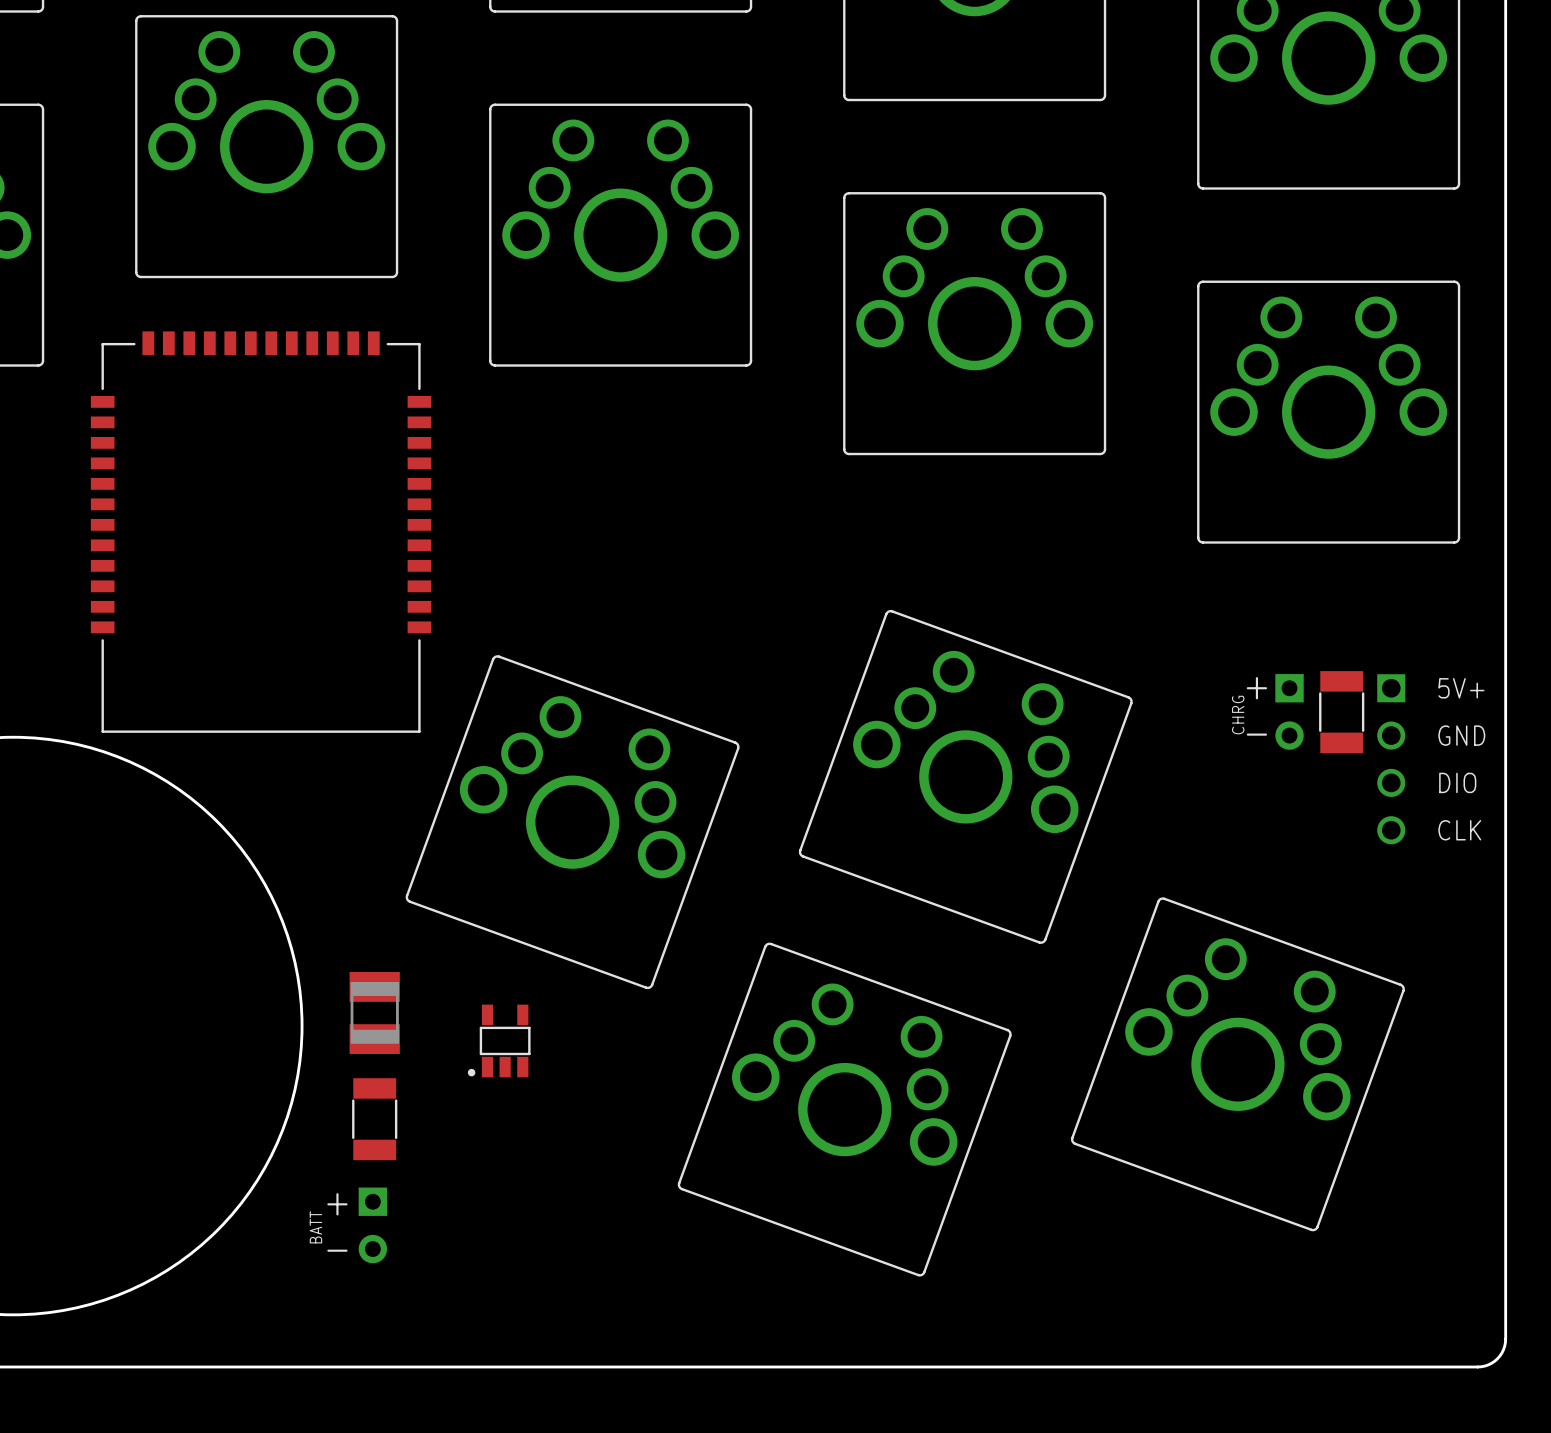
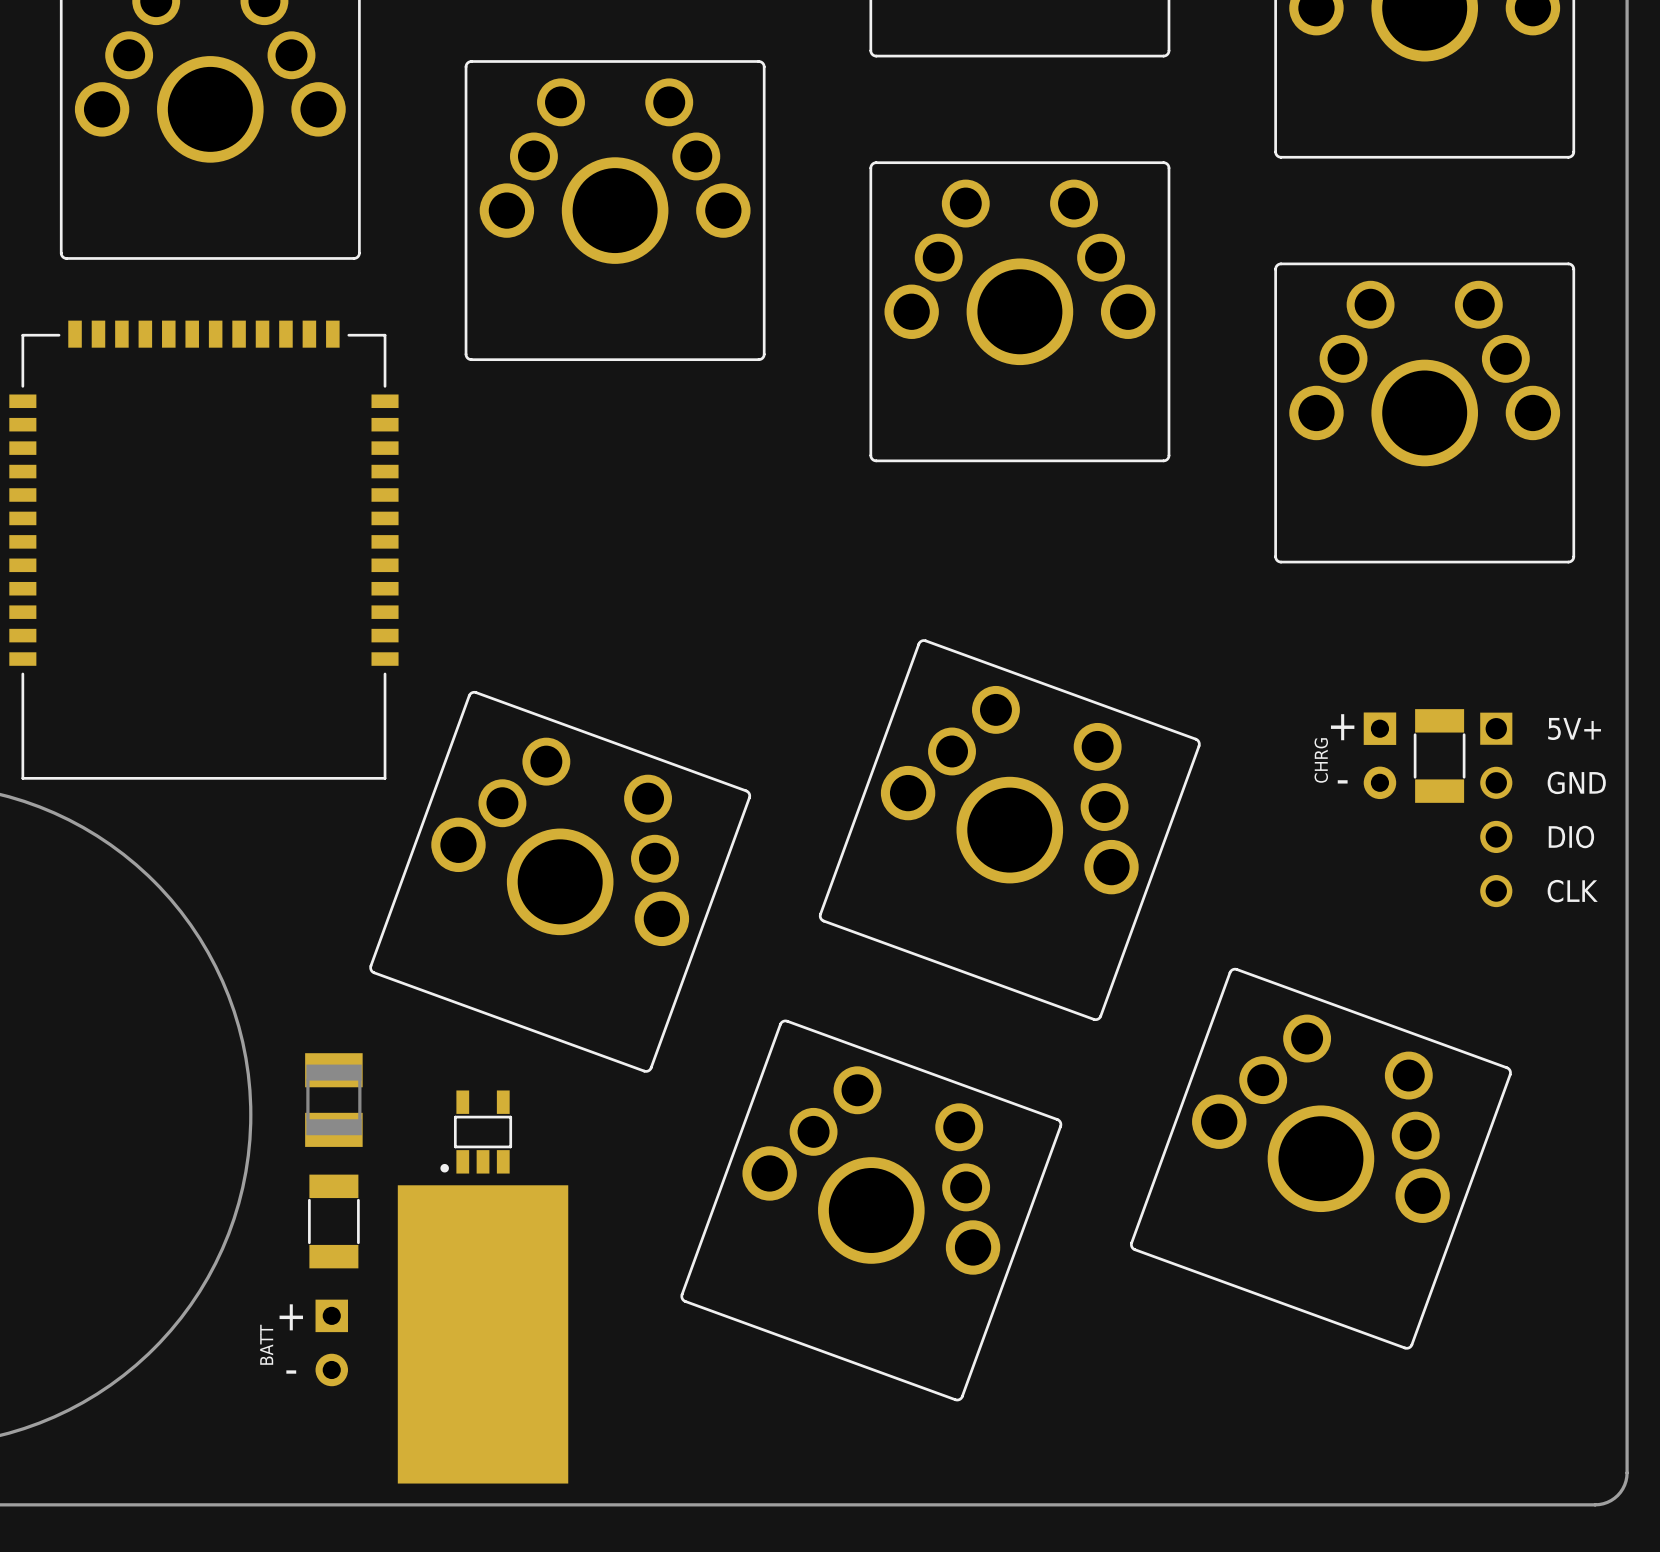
part: none -> (483, 1287)

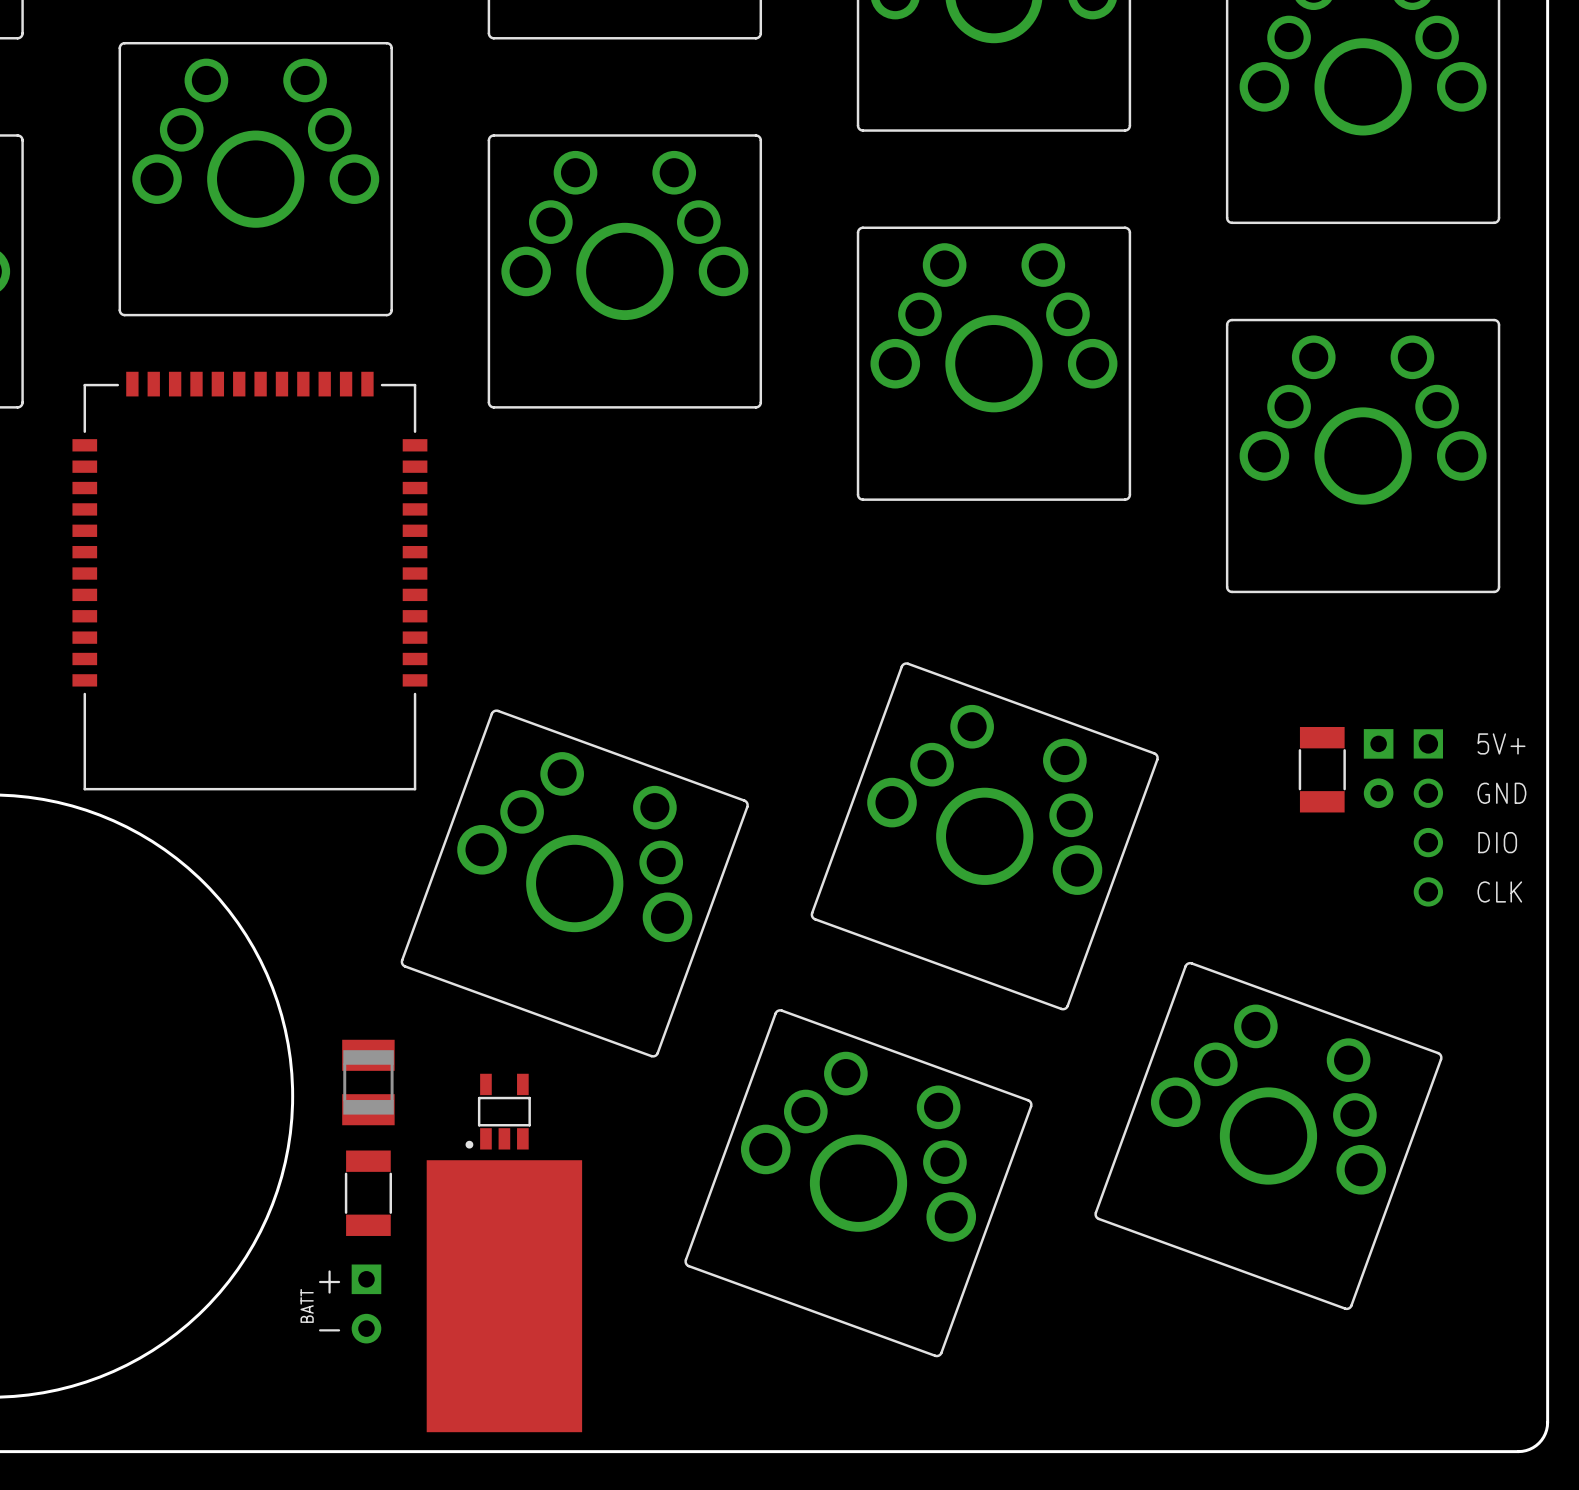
part footprint: [1413, 709, 1466, 803] -> [1363, 729, 1394, 809]
part footprint: [1363, 712, 1397, 800] -> [1298, 726, 1346, 813]
text: + (1342, 727) -> none
text: CHRG (1321, 760) -> none
text: - (1342, 781) -> none

